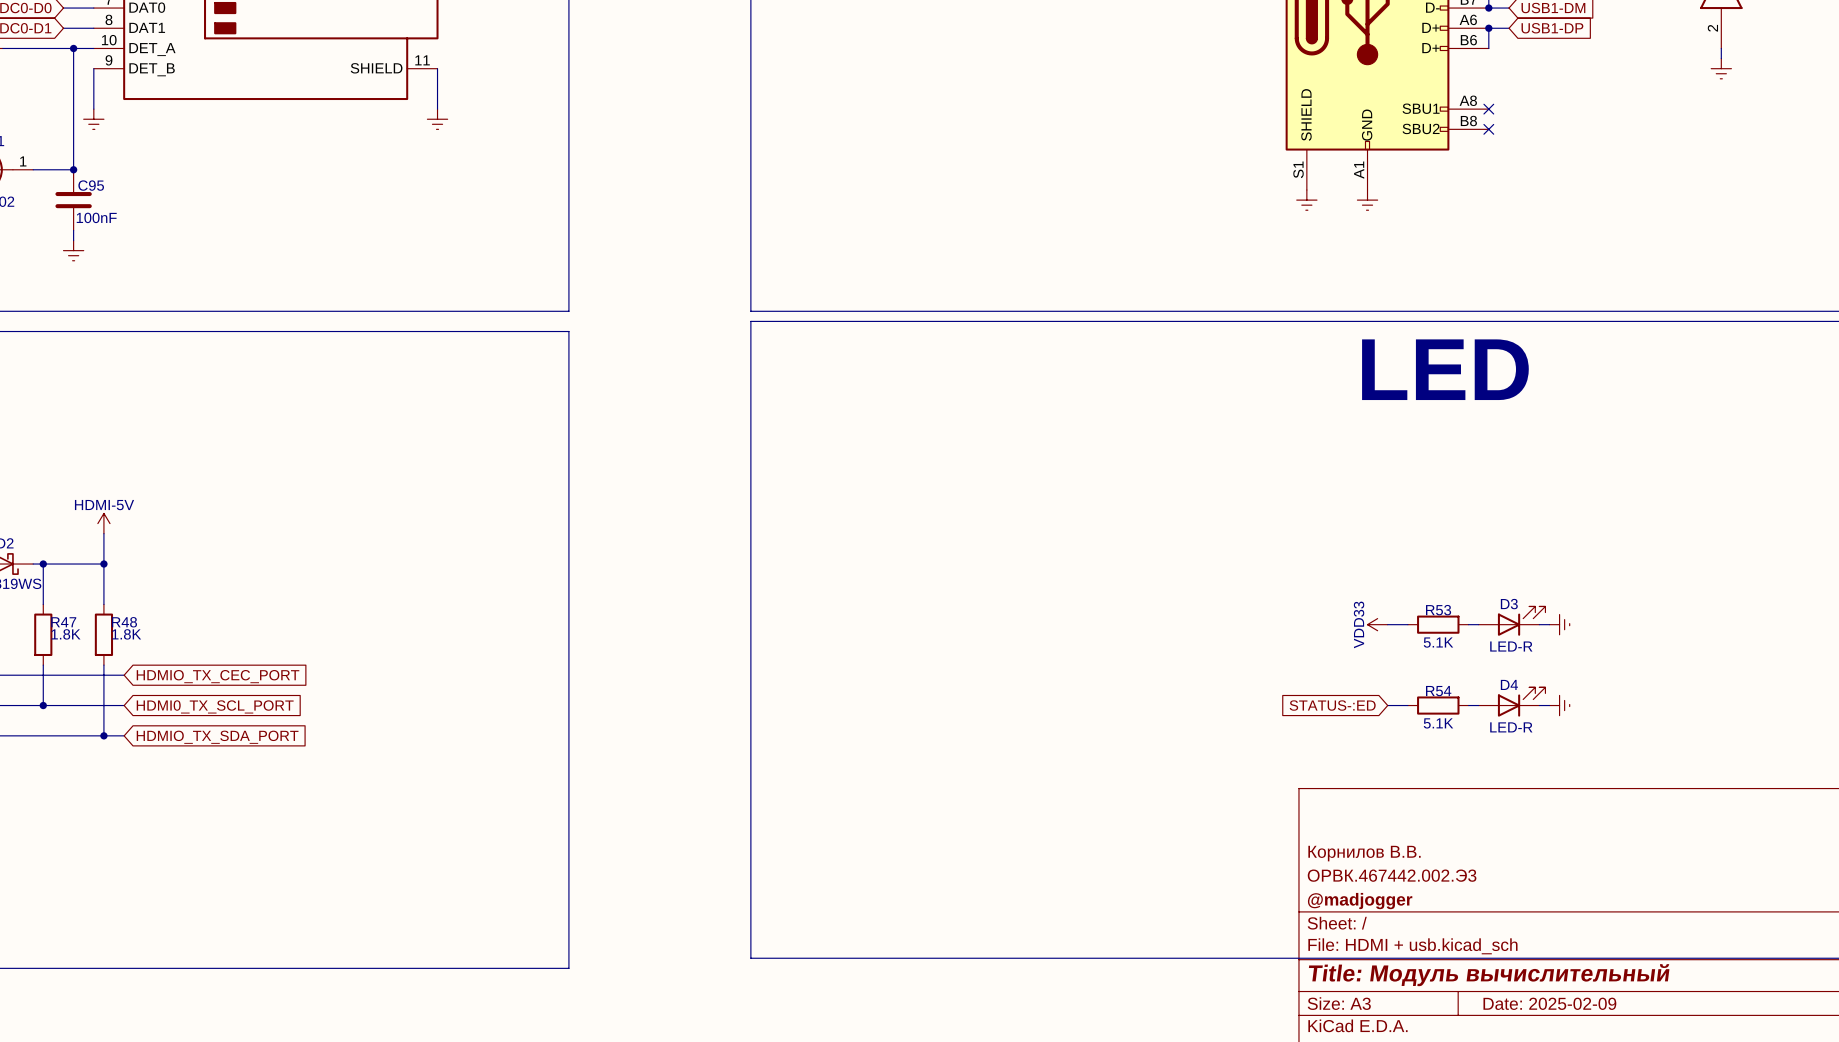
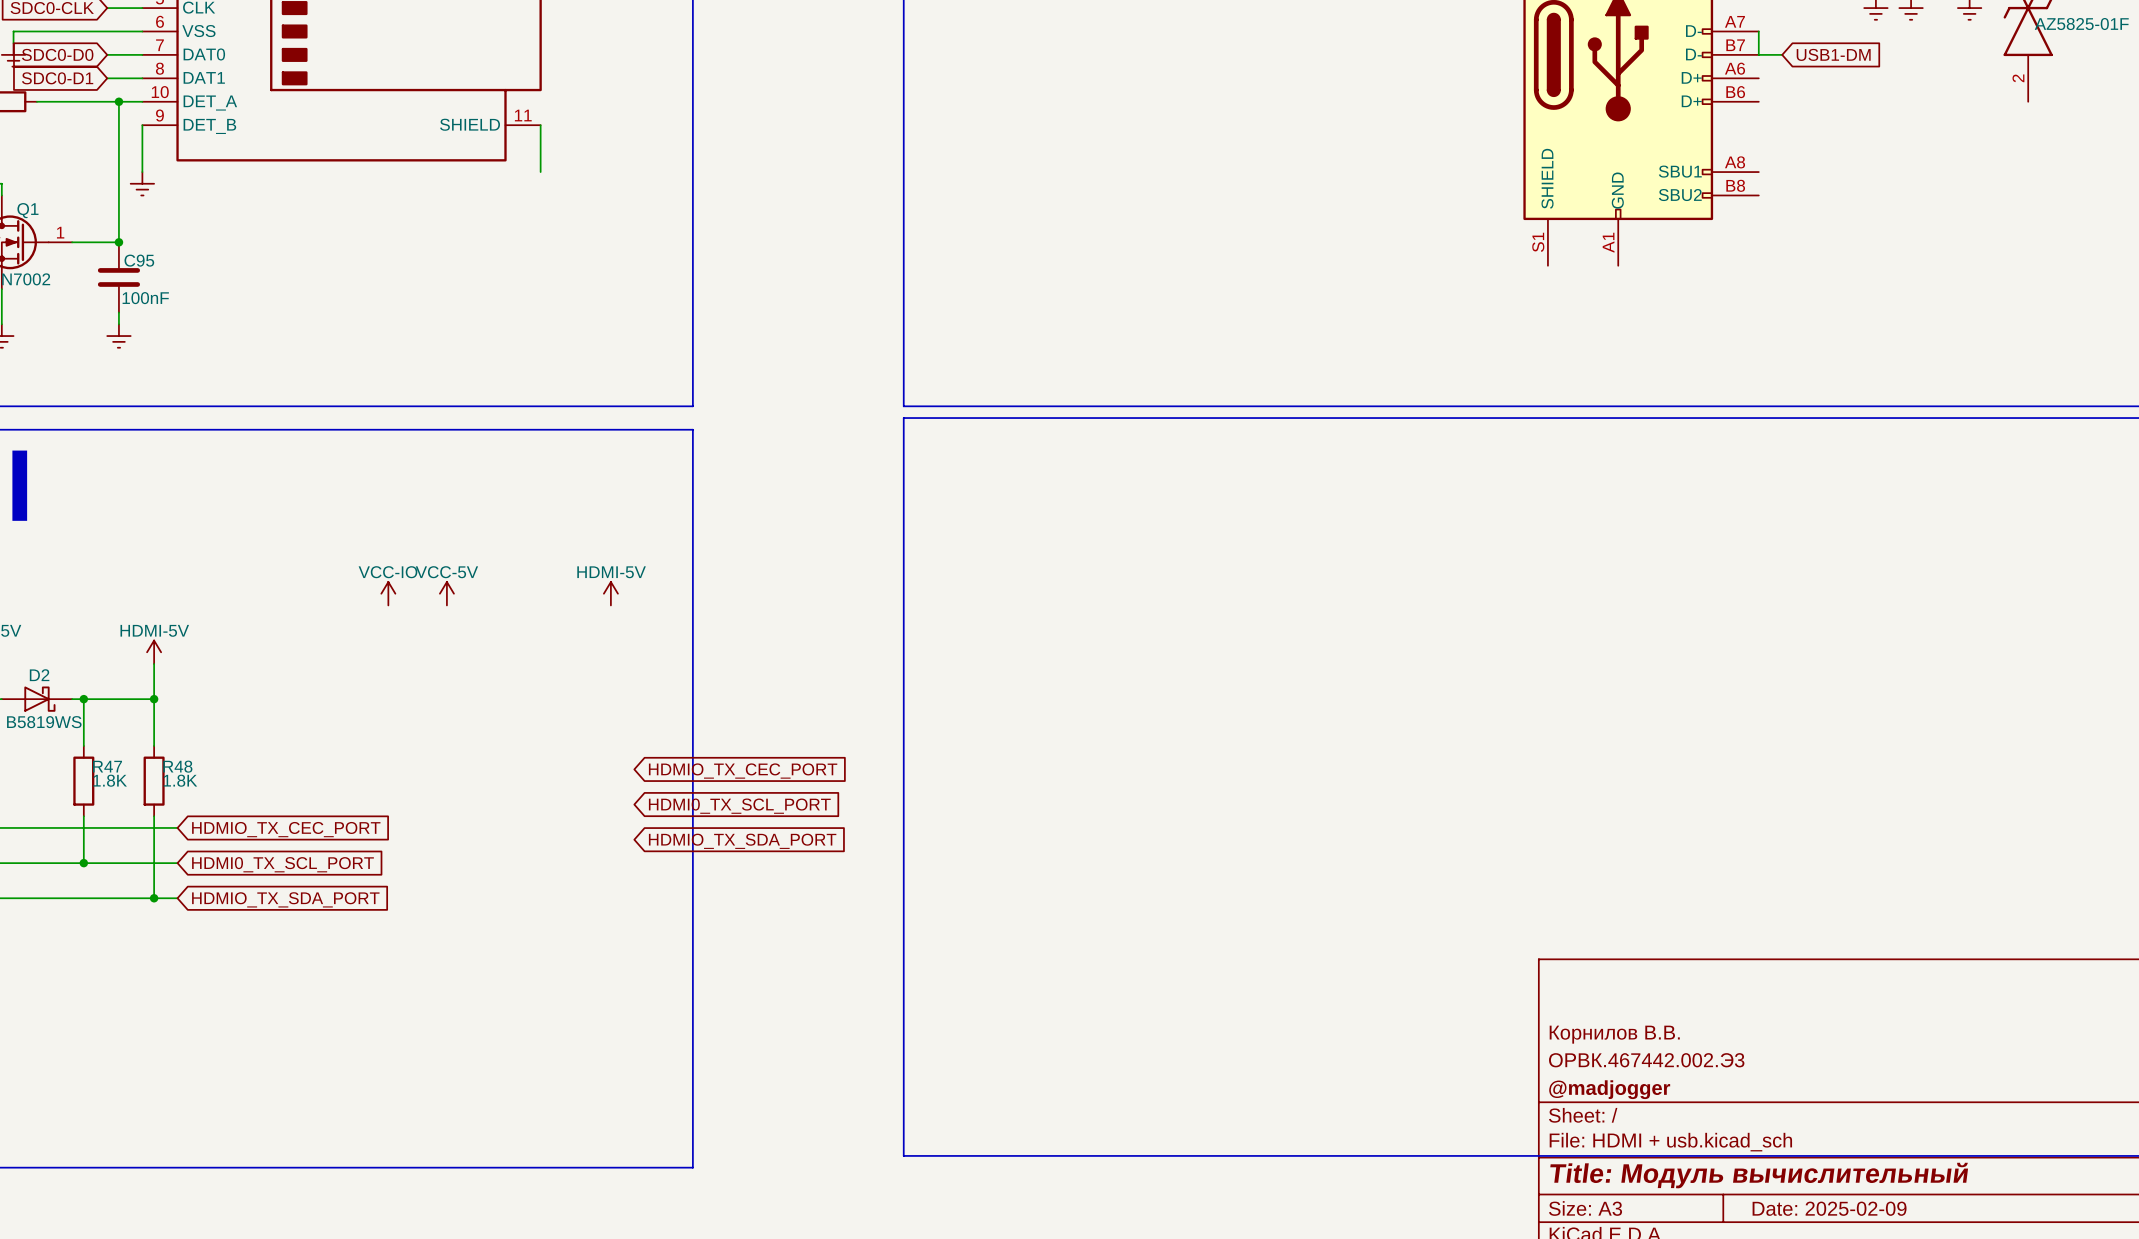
junction: (1488, 8) -> none
junction: (1488, 28) -> none
wire: (1509, 28) (1488, 28) (1488, 48) -> none
global label: USB1-DP (1552, 28) -> none
wire: (1721, 48) (1721, 58) -> none
power symbol: (1721, 68) -> none
no-connect mark: (1488, 109) -> none
power symbol: (437, 119) -> none
no-connect mark: (1488, 129) -> none
power symbol: (1306, 200) -> none
power symbol: (1367, 200) -> none
text: LED (1445, 369) -> none
power symbol: none -> VCC-IO (388, 593)
power symbol: none -> VCC-5V (446, 593)
power symbol: none -> HDMI-5V (610, 593)
D3: LED-R (1512, 621) -> none
power symbol: VDD33 (1377, 624) -> none
wire: (1387, 624) (1407, 624) -> none
R53: 5.1K (1438, 624) -> none
wire: (1468, 624) (1478, 624) -> none
wire: (1539, 624) (1549, 624) -> none
power symbol: (1559, 624) -> none
global label: none -> HDMIO_TX_CEC_PORT (743, 771)
global label: none -> HDMI0_TX_SCL_PORT (739, 806)
global label: none -> HDMIO_TX_SDA_PORT (742, 841)
D4: LED-R (1512, 701) -> none
global label: STATUS-:ED (1332, 705) -> none
wire: (1387, 705) (1407, 705) -> none
R54: 5.1K (1438, 705) -> none
wire: (1468, 705) (1478, 705) -> none
wire: (1539, 705) (1549, 705) -> none
power symbol: (1559, 705) -> none

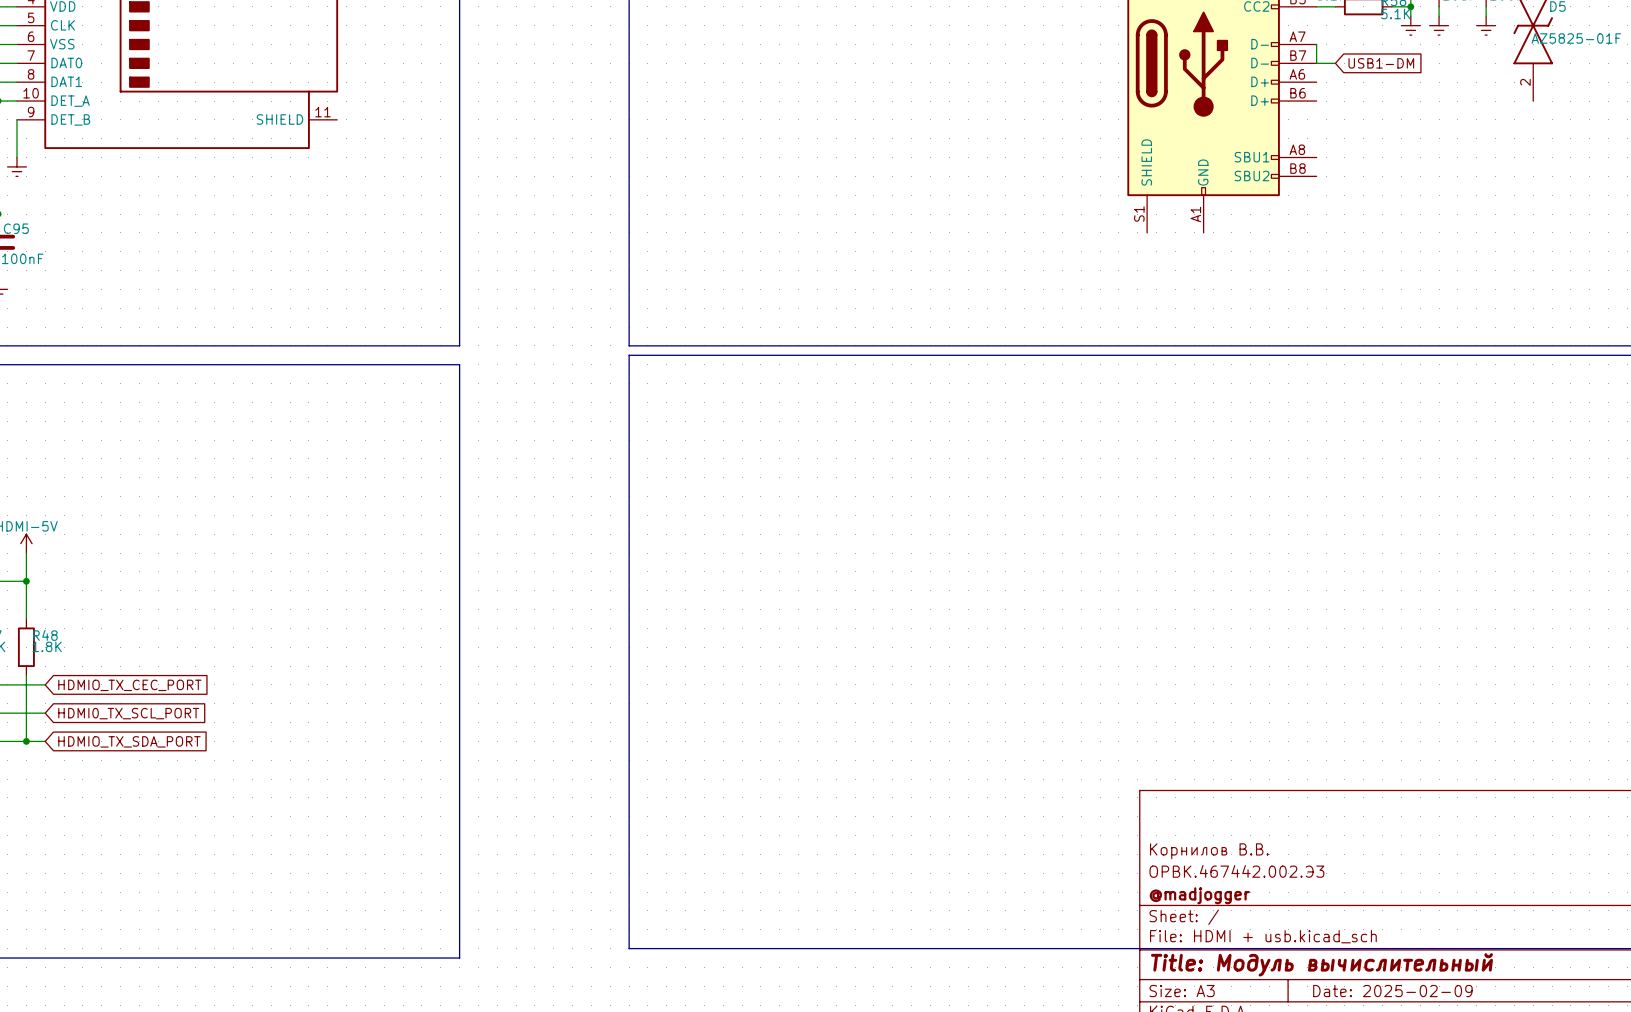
wire: (540, 125) (540, 172) -> none
power symbol: VCC-IO (388, 593) -> none
power symbol: VCC-5V (446, 593) -> none
power symbol: HDMI-5V (610, 593) -> none
global label: HDMIO_TX_CEC_PORT (743, 771) -> none
global label: HDMI0_TX_SCL_PORT (739, 806) -> none
global label: HDMIO_TX_SDA_PORT (742, 841) -> none

